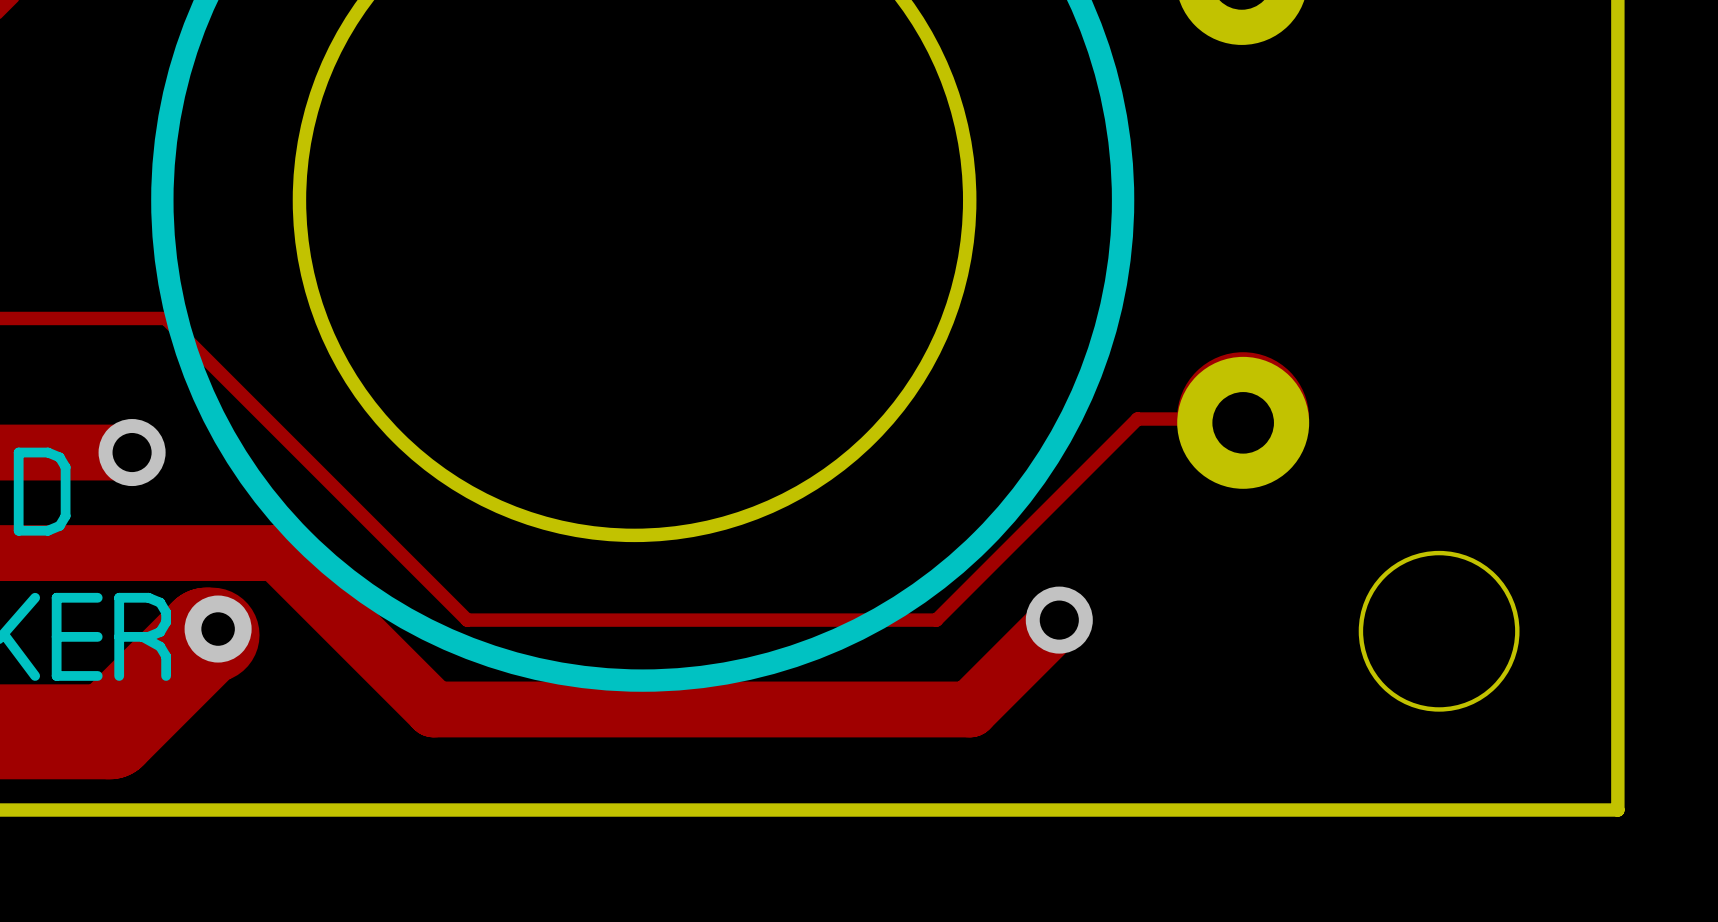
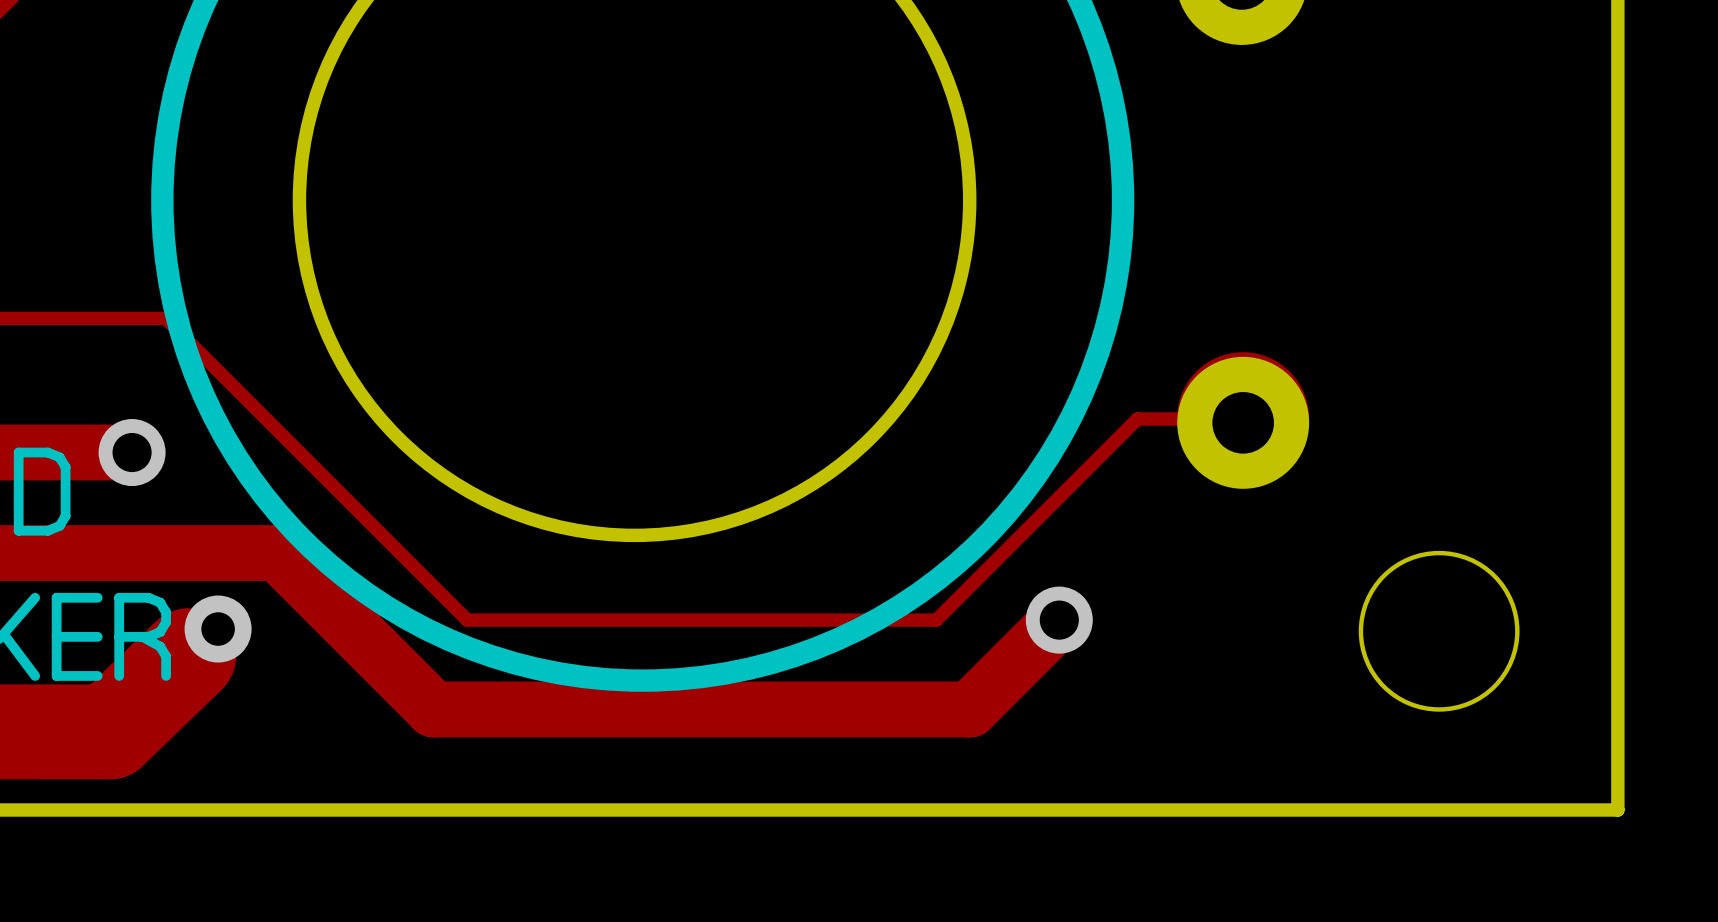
track: (212, 635) (206, 635) (109, 731) -> (188, 655) (109, 731)

